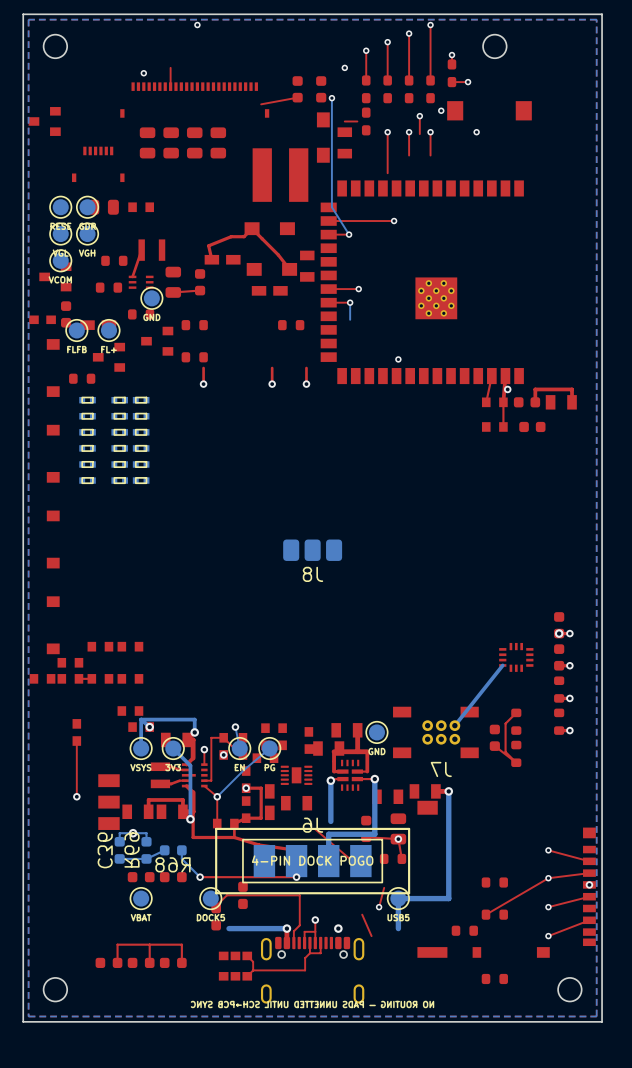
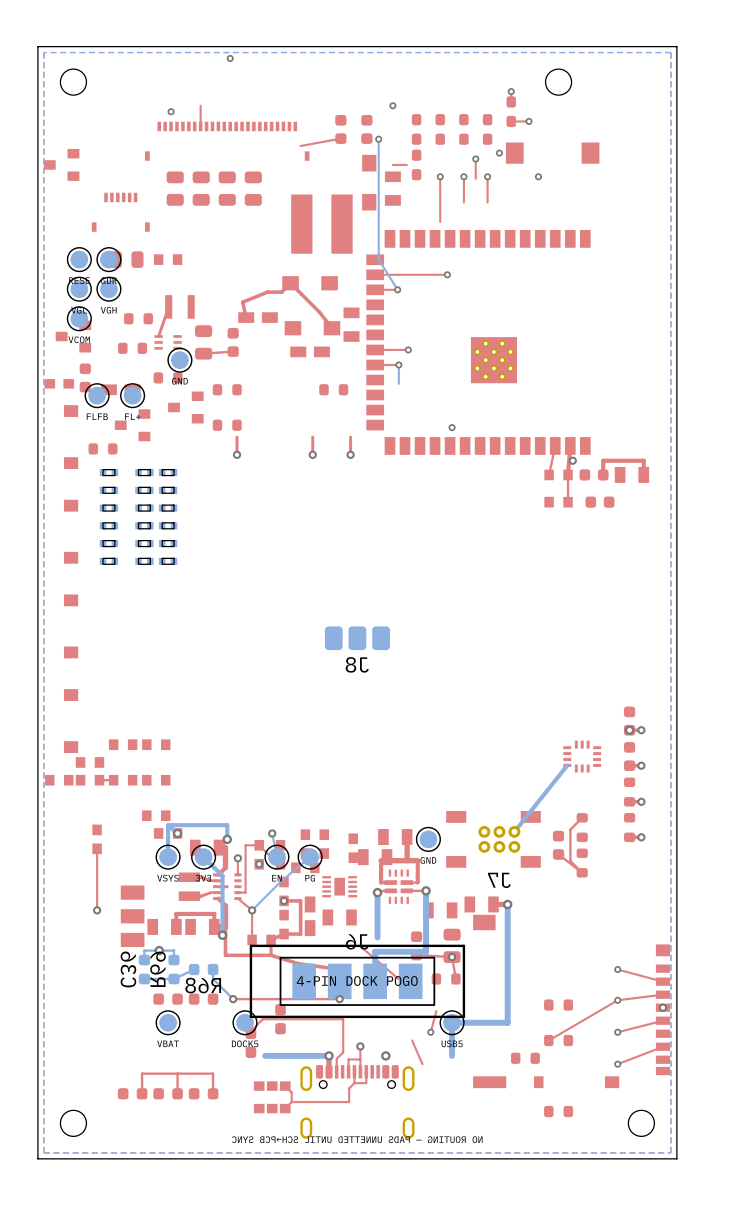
top track: (430, 25) (430, 80) -> none
via: (430, 25) -> none
top track: (409, 33) (409, 80) -> none
via: (409, 33) -> none
top track: (387, 42) (387, 80) -> none
via: (387, 42) -> none
top track: (366, 50) (366, 80) -> none
via: (366, 50) -> none

